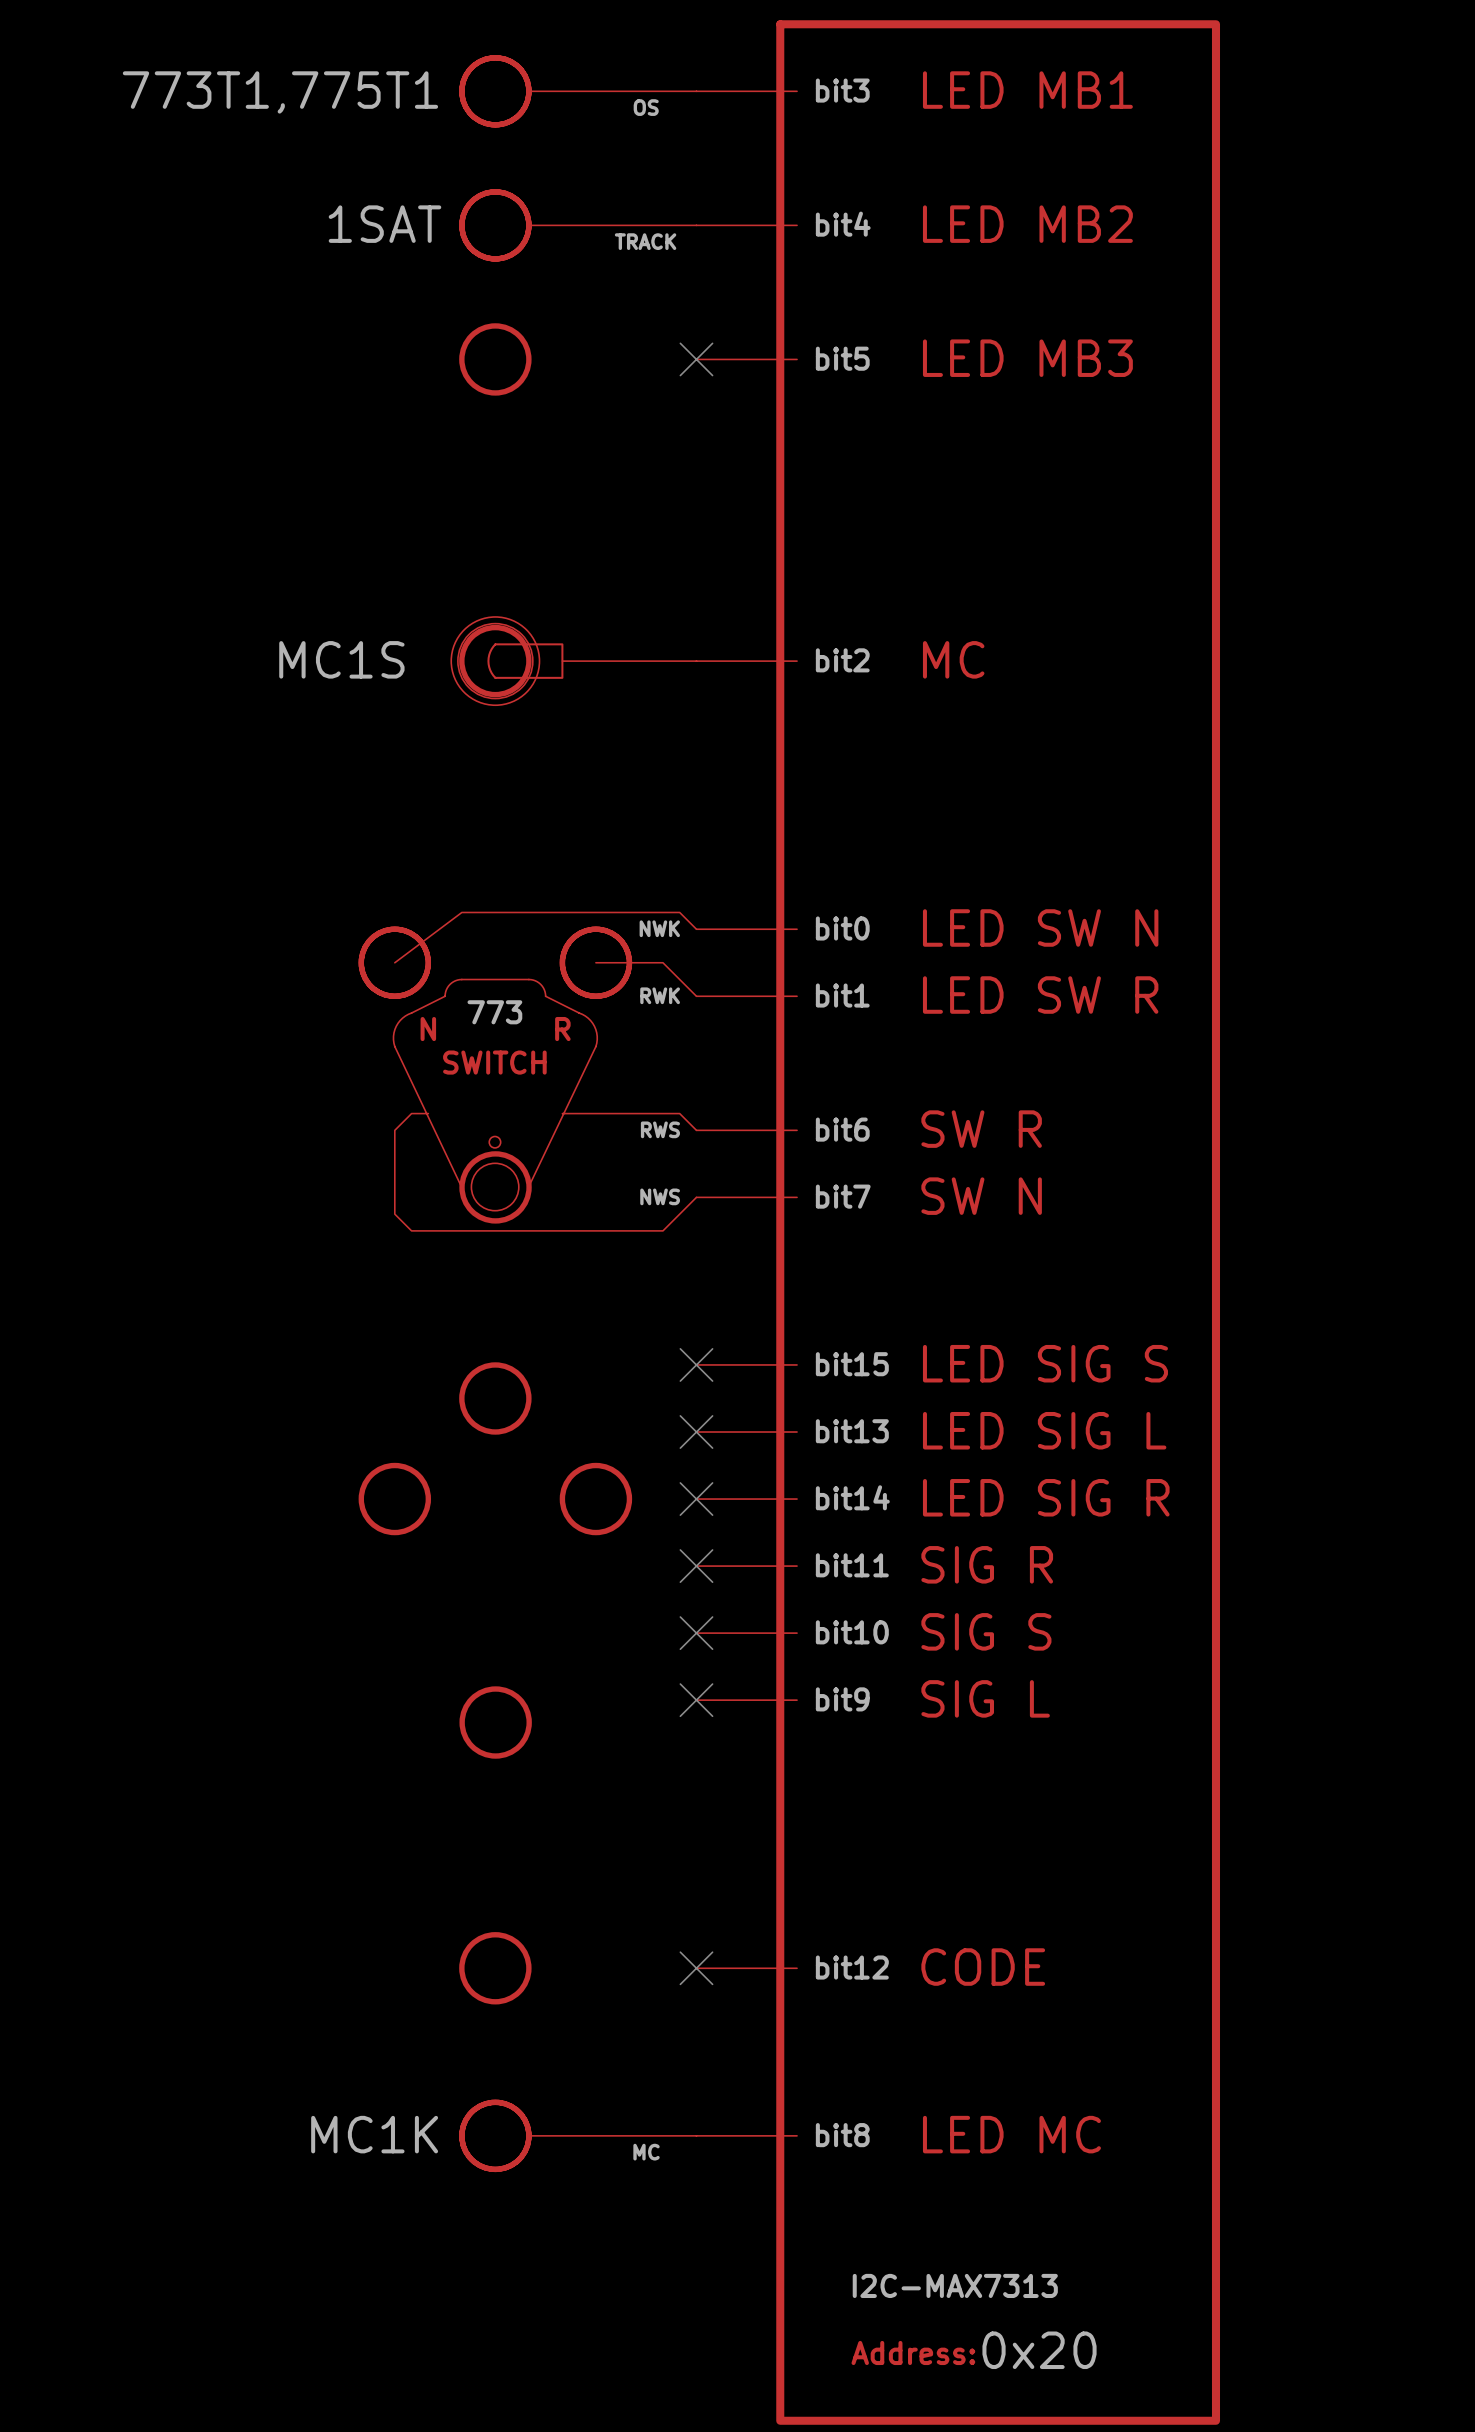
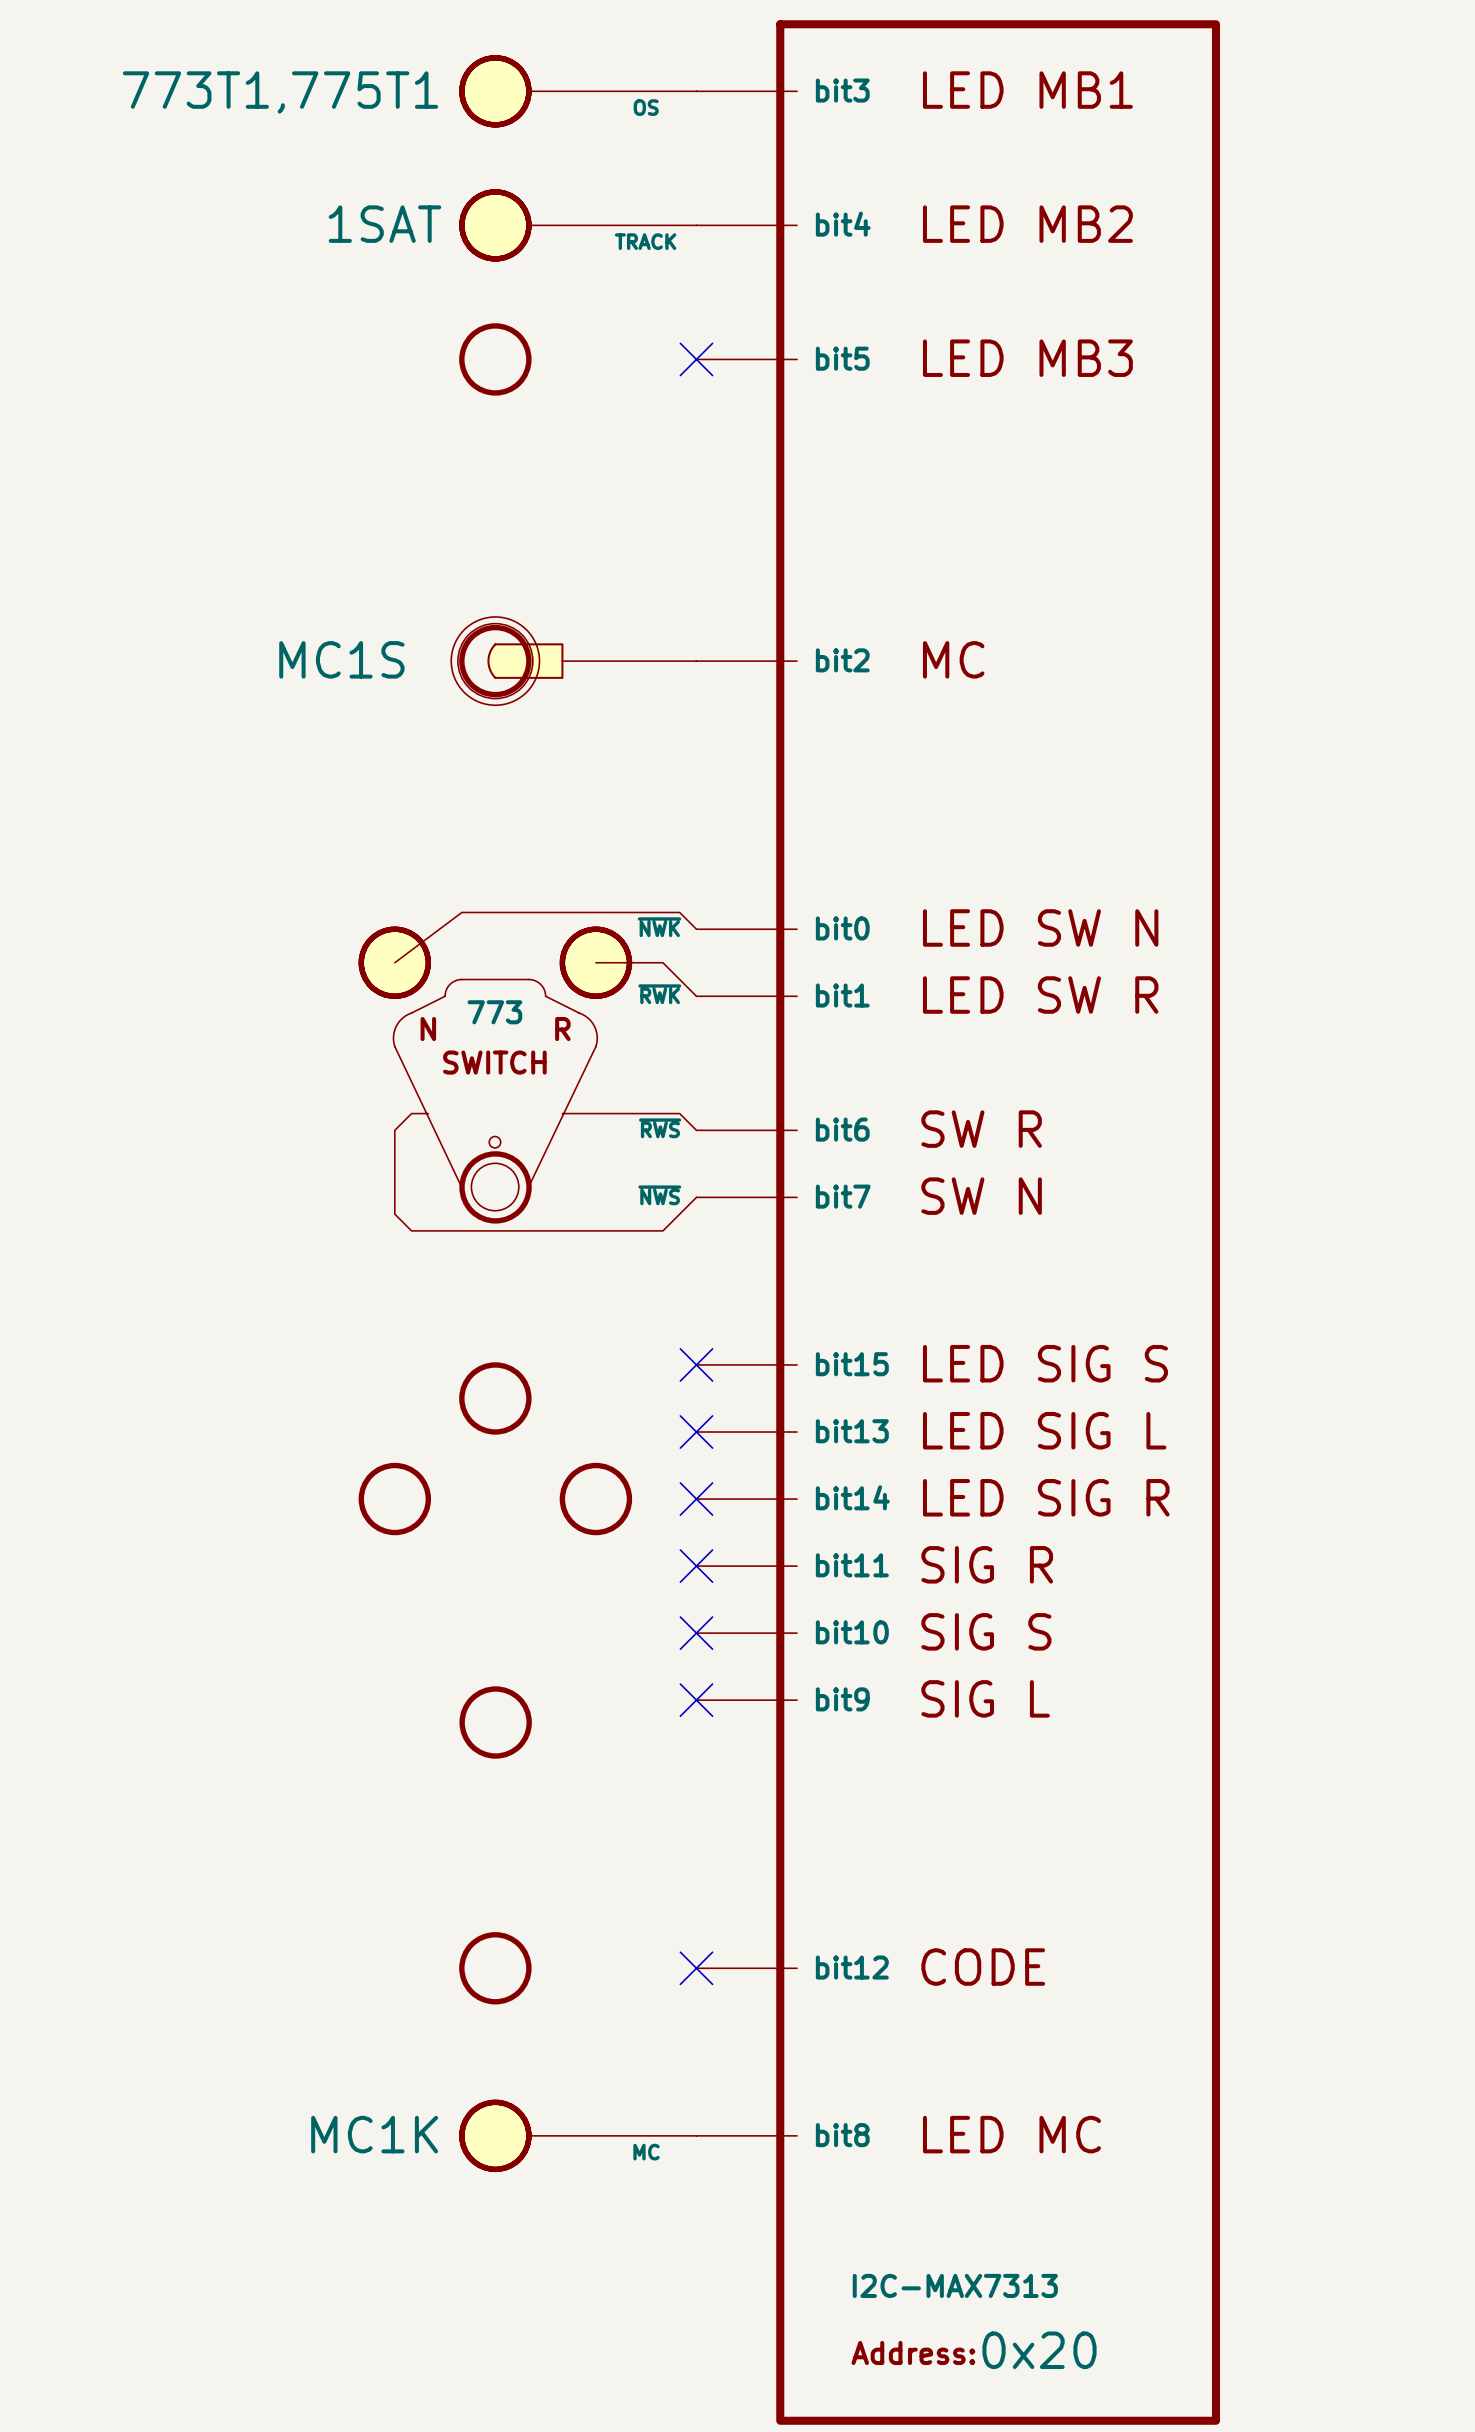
part pin name: NWK (659, 928) -> ~{NWK} (659, 927)
part pin name: RWK (660, 995) -> ~{RWK} (659, 994)
part pin name: RWS (660, 1129) -> ~{RWS} (660, 1128)
part pin name: NWS (660, 1196) -> ~{NWS} (659, 1195)

